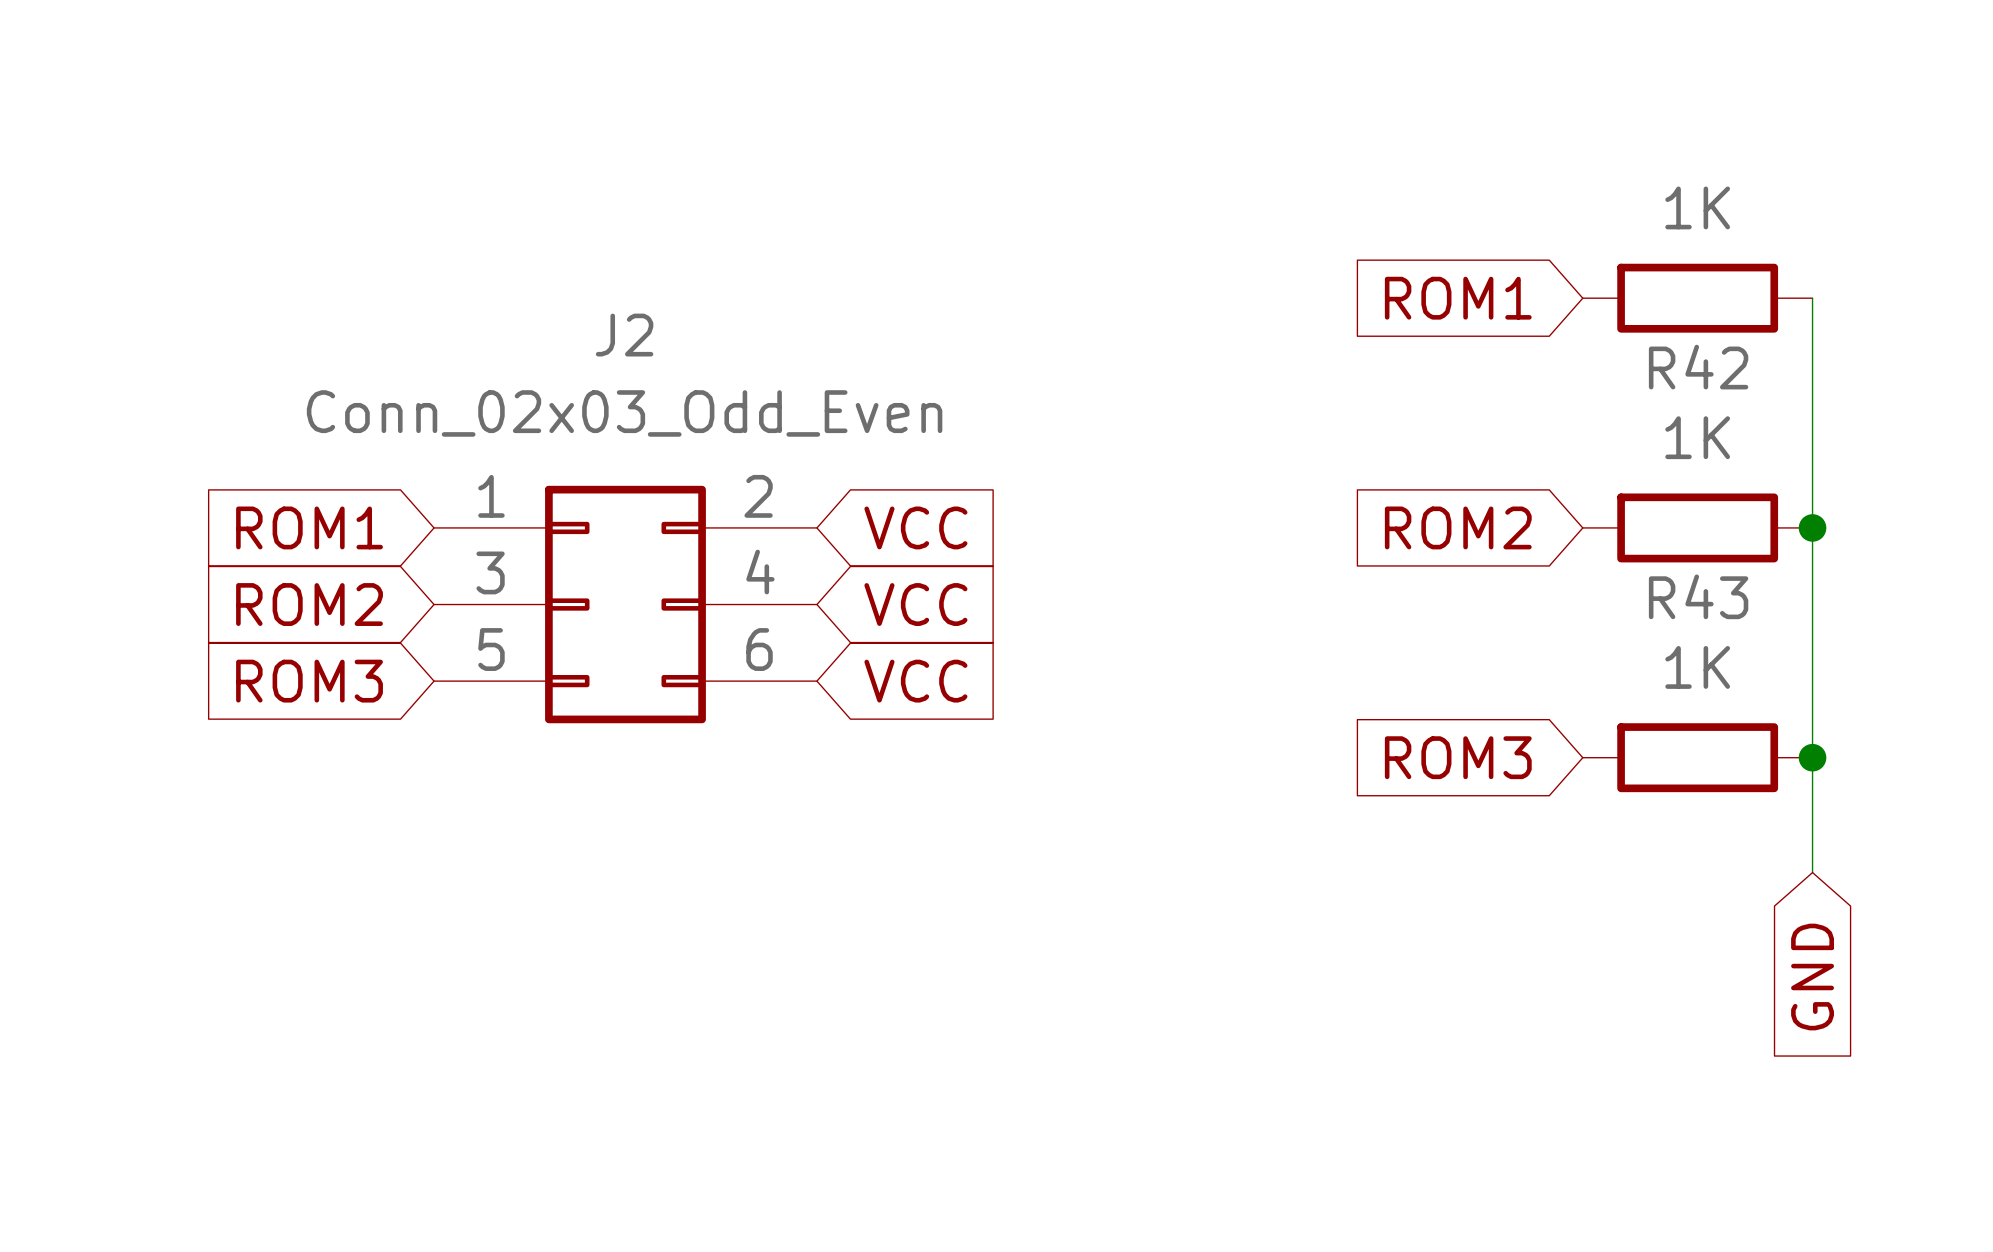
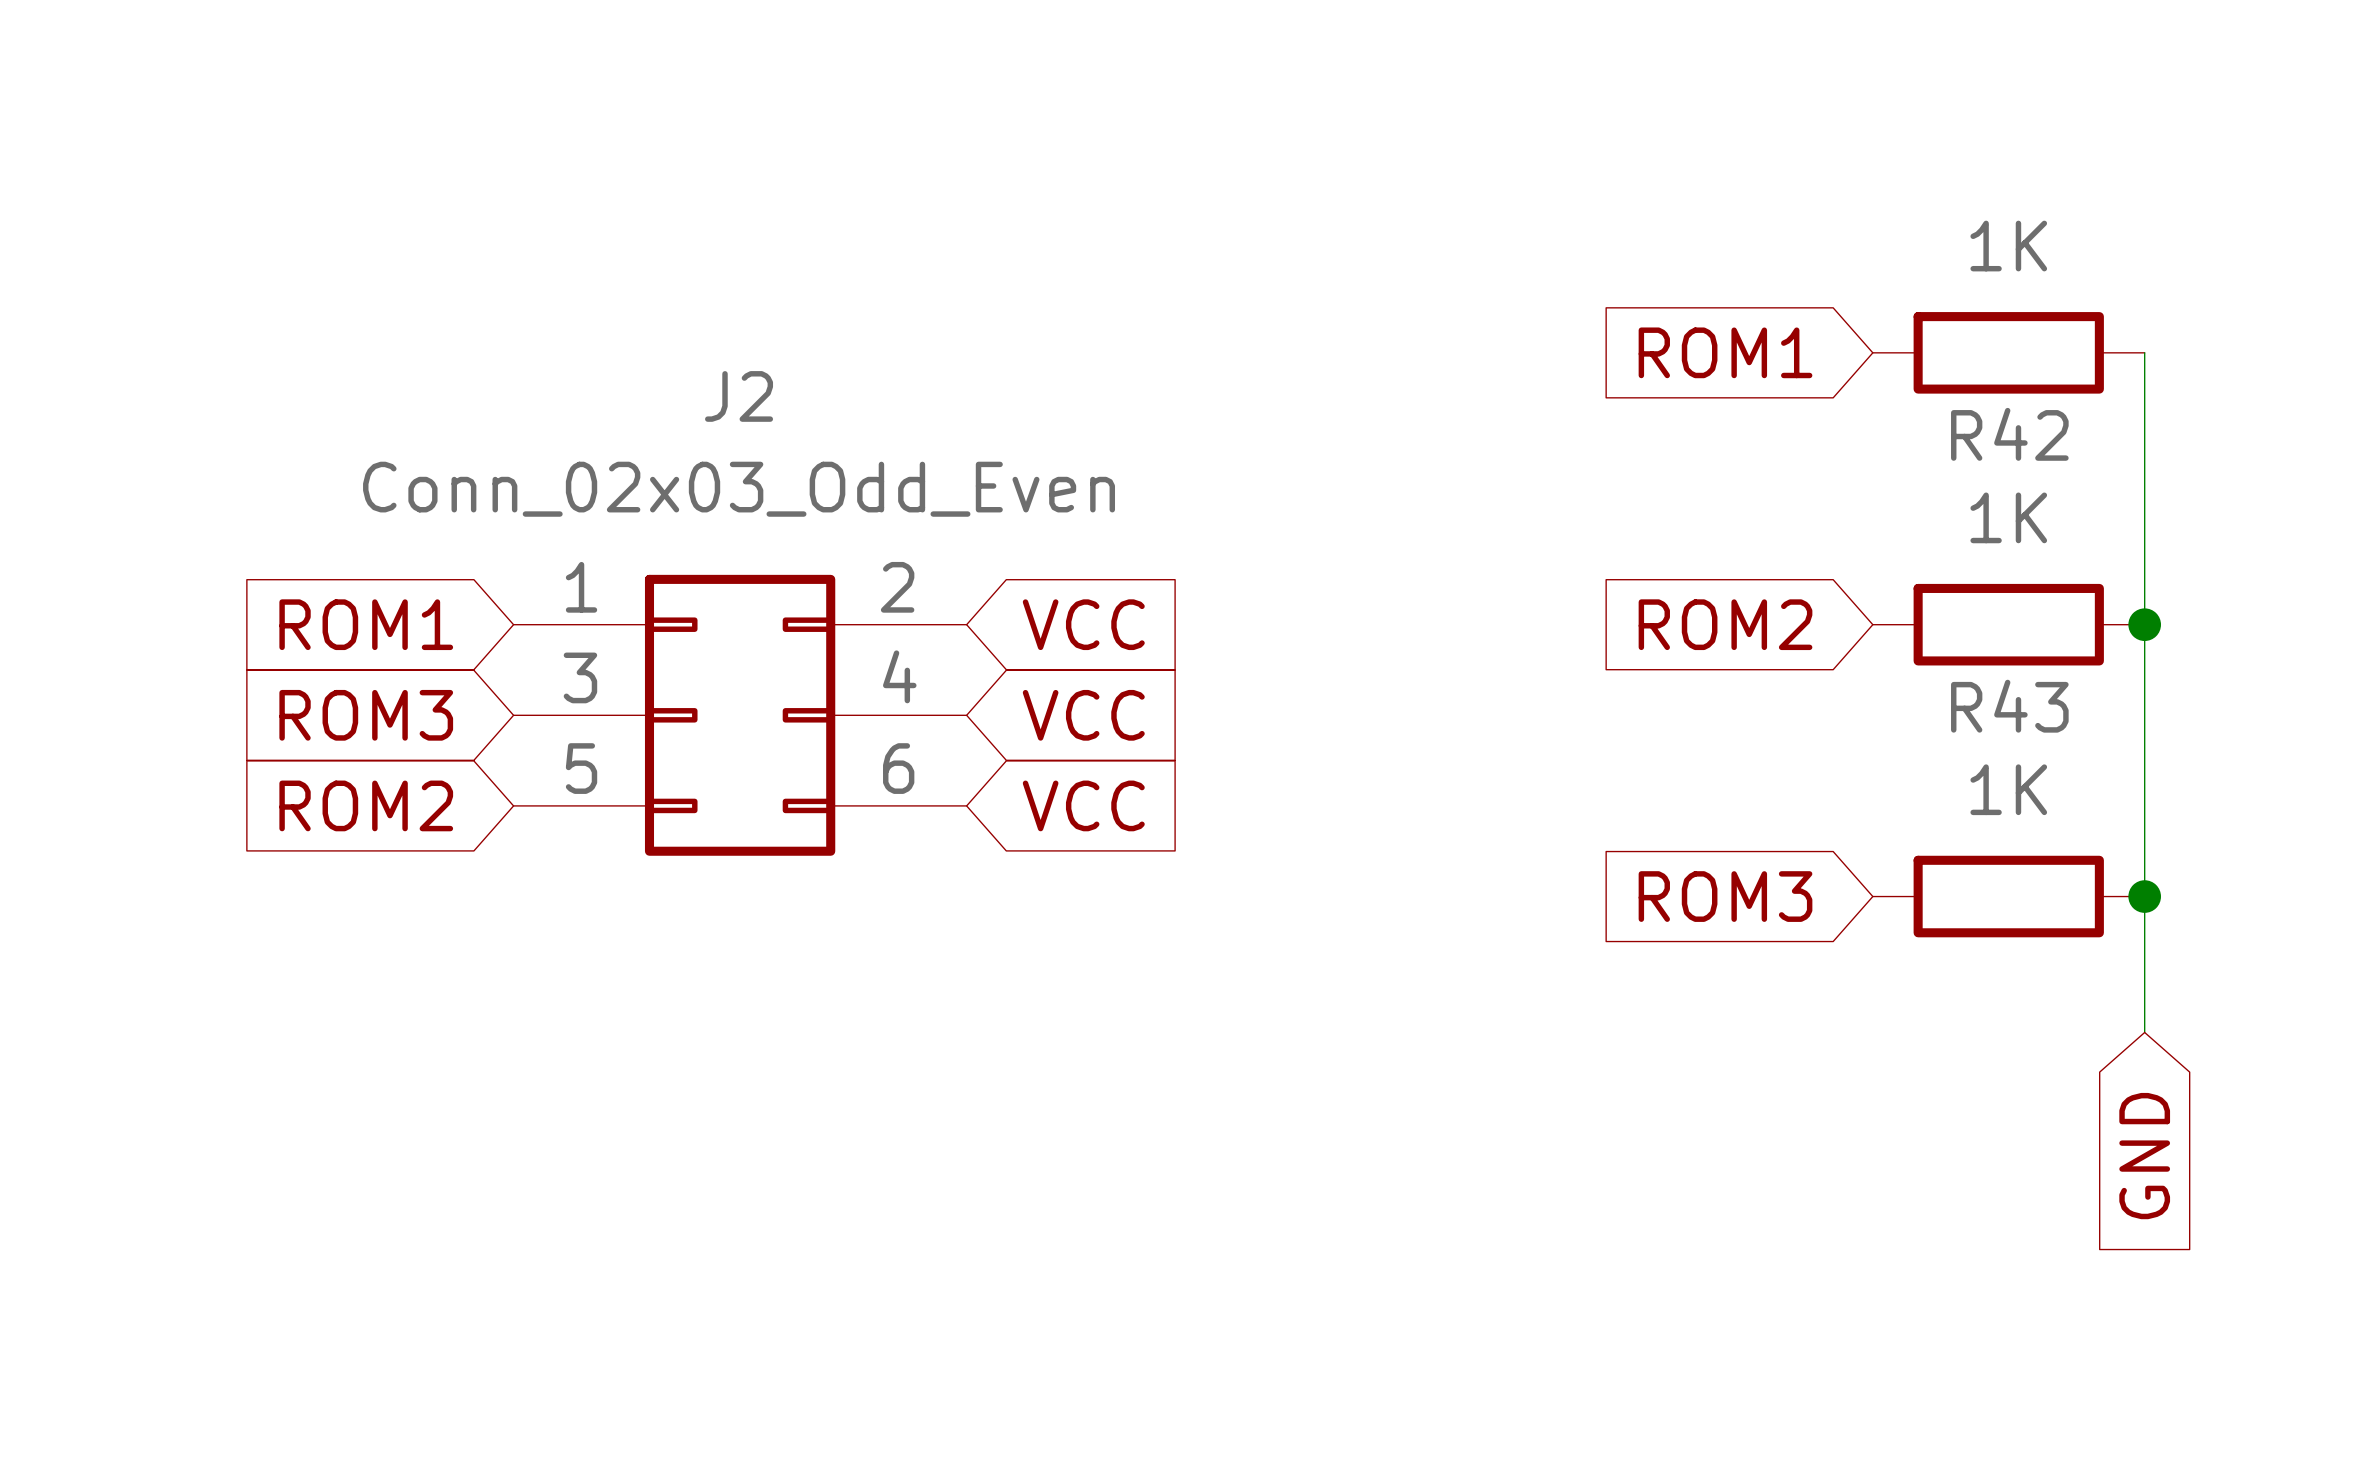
global label: ROM2 (309, 604) -> ROM3 (366, 715)
global label: ROM3 (309, 681) -> ROM2 (366, 805)

